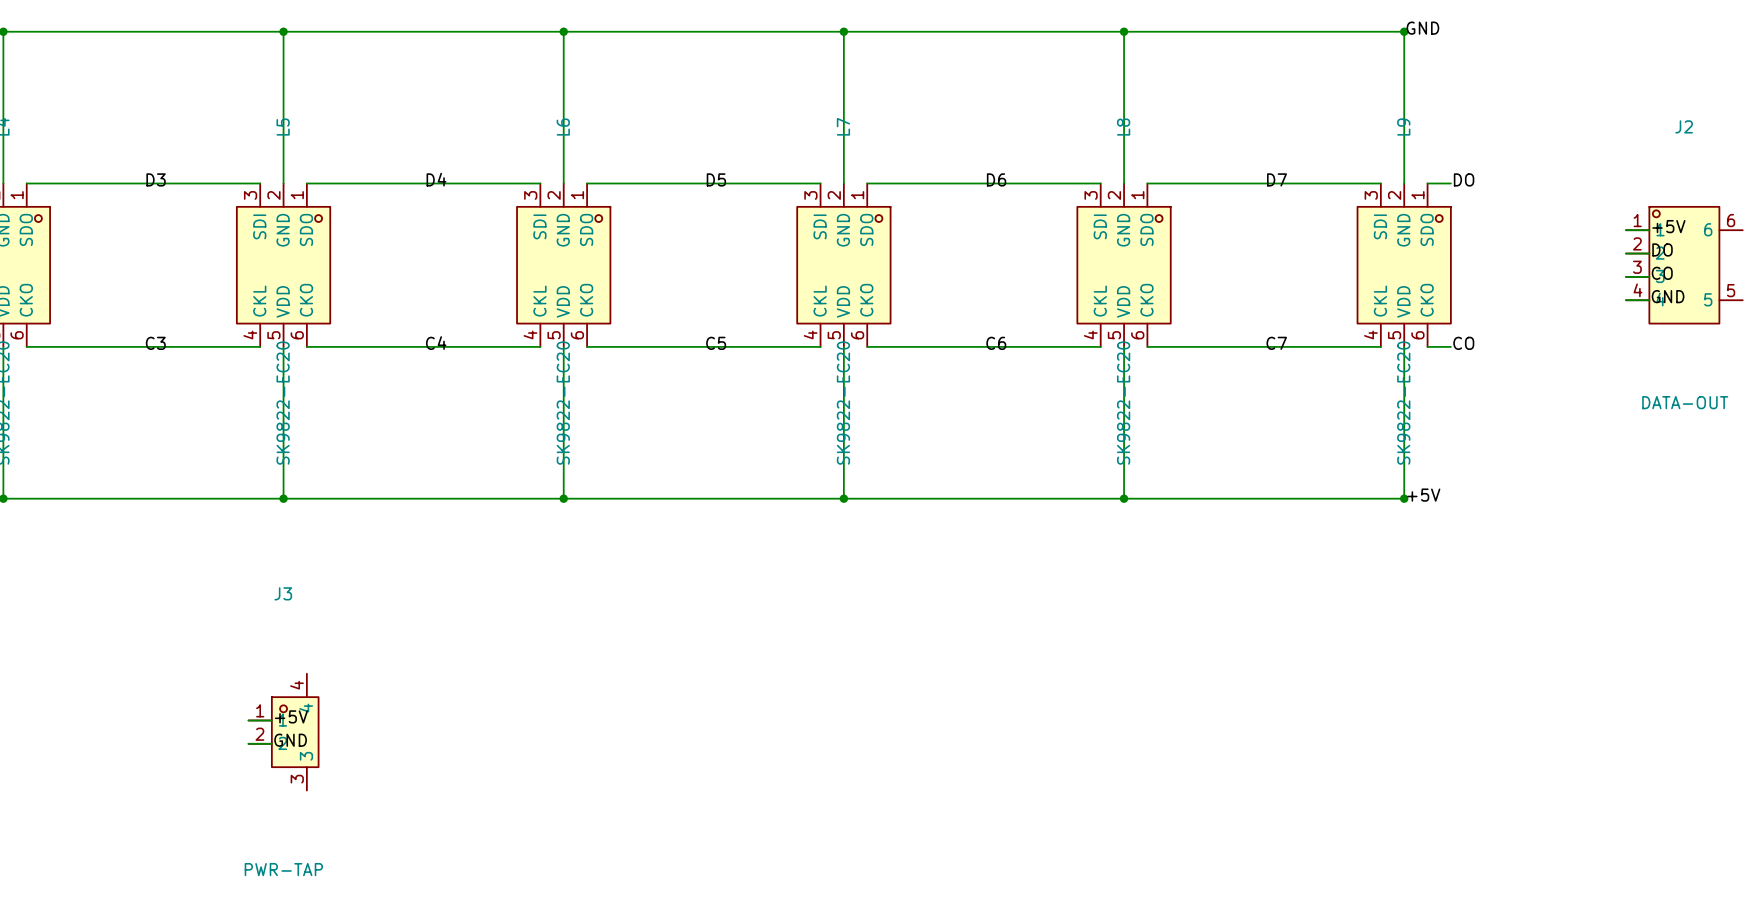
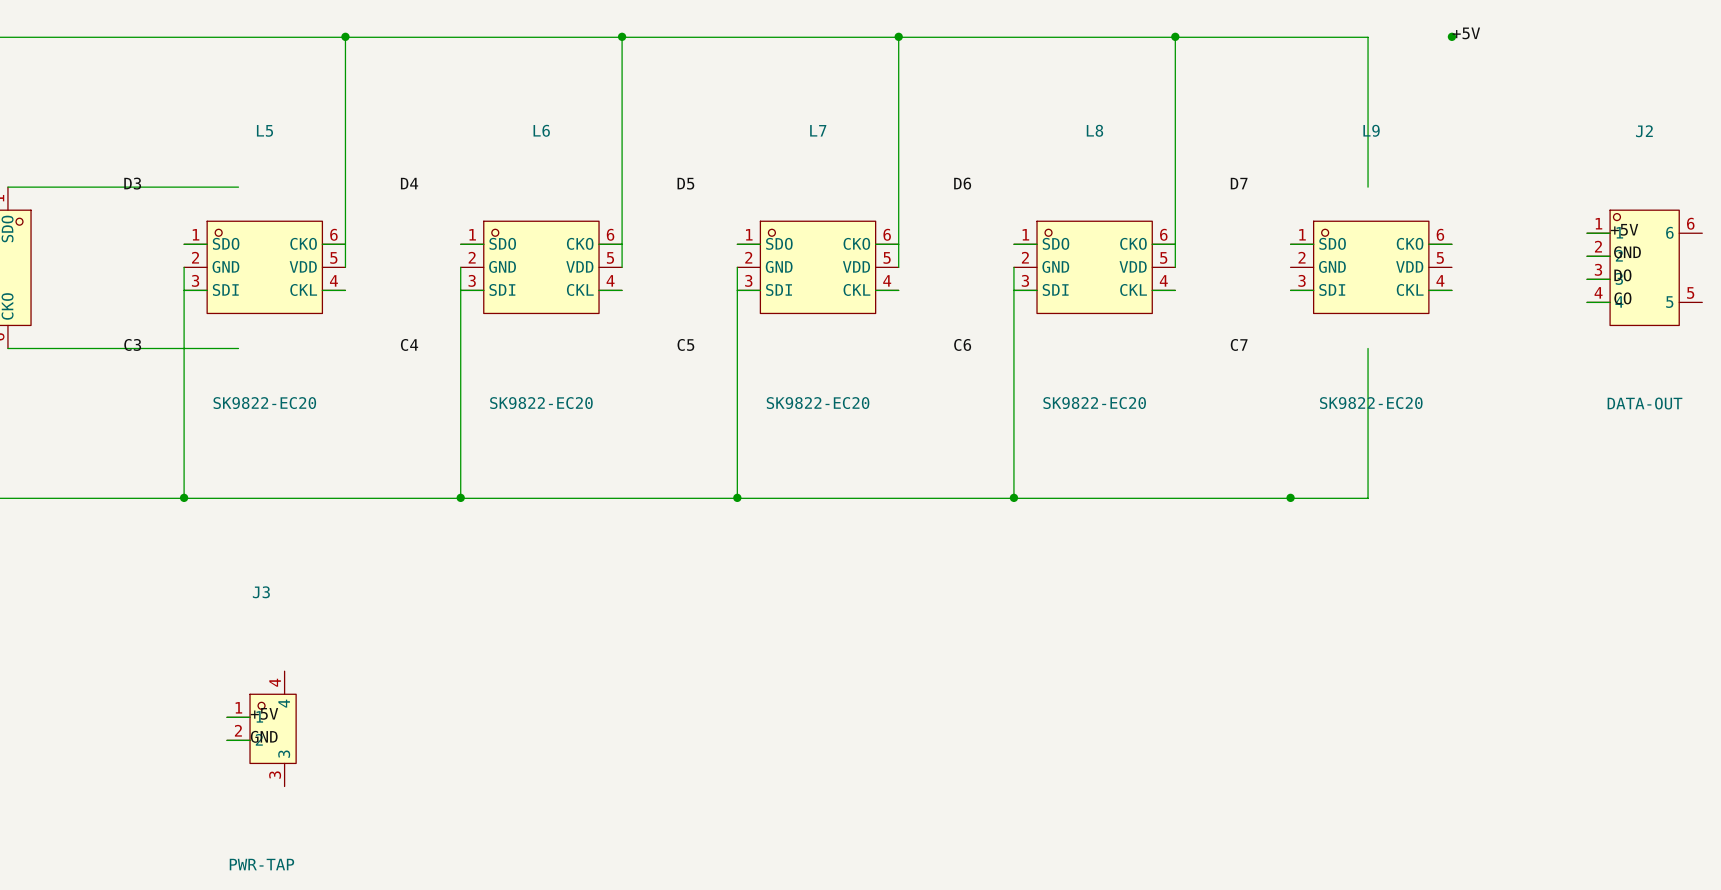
label: none -> +5V (1466, 33)
label: GND (1422, 28) -> none
wire: (283, 31) (283, 183) -> none
junction: (283, 31) -> none
wire: none -> (345, 36) (345, 267)
junction: none -> (345, 36)
wire: (563, 31) (563, 183) -> none
junction: (563, 31) -> none
wire: none -> (622, 36) (622, 267)
junction: none -> (622, 36)
wire: (843, 31) (843, 183) -> none
junction: (843, 31) -> none
wire: none -> (898, 36) (898, 267)
junction: none -> (898, 36)
wire: (1124, 31) (1124, 183) -> none
junction: (1124, 31) -> none
wire: none -> (1175, 36) (1175, 267)
junction: none -> (1175, 36)
junction: (1404, 31) -> none
junction: none -> (1451, 36)
label: DO (1464, 179) -> none
wire: (306, 183) (540, 183) -> none
wire: (587, 183) (820, 183) -> none
wire: (867, 183) (1100, 183) -> none
wire: (1147, 183) (1380, 183) -> none
wire: (1427, 183) (1450, 183) -> (1428, 244) (1451, 244)
wire: none -> (184, 244) (207, 244)
wire: none -> (322, 244) (345, 244)
wire: none -> (460, 244) (483, 244)
wire: none -> (599, 244) (622, 244)
wire: none -> (737, 244) (760, 244)
wire: none -> (875, 244) (898, 244)
wire: none -> (1013, 244) (1037, 244)
wire: none -> (1152, 244) (1175, 244)
wire: none -> (1290, 244) (1313, 244)
label position: DO (1662, 249) -> DO (1622, 275)
wire: none -> (184, 267) (184, 497)
wire: none -> (460, 267) (460, 497)
wire: none -> (737, 267) (737, 497)
wire: none -> (1013, 267) (1013, 497)
L5 rotation: 0° (283, 265) -> 90° counterclockwise (264, 267)
L6 rotation: 0° (563, 265) -> 90° counterclockwise (541, 267)
L7 rotation: 0° (843, 265) -> 90° counterclockwise (818, 267)
L8 rotation: 0° (1124, 265) -> 90° counterclockwise (1094, 267)
L9 rotation: 0° (1404, 265) -> 90° counterclockwise (1371, 267)
label position: CO (1662, 273) -> CO (1622, 298)
wire: none -> (184, 290) (207, 290)
wire: none -> (322, 290) (345, 290)
wire: none -> (460, 290) (483, 290)
wire: none -> (599, 290) (622, 290)
wire: none -> (737, 290) (760, 290)
wire: none -> (875, 290) (898, 290)
wire: none -> (1013, 290) (1037, 290)
wire: none -> (1152, 290) (1175, 290)
wire: none -> (1290, 290) (1313, 290)
label position: GND (1668, 296) -> GND (1627, 252)
label: CO (1463, 343) -> none
wire: (283, 346) (283, 498) -> none
wire: (306, 346) (540, 346) -> none
wire: (563, 346) (563, 498) -> none
wire: (587, 346) (820, 346) -> none
wire: (843, 346) (843, 498) -> none
wire: (867, 346) (1100, 346) -> none
wire: (1124, 346) (1124, 498) -> none
wire: (1147, 346) (1380, 346) -> none
wire: (1427, 346) (1450, 346) -> (1428, 290) (1451, 290)
label: +5V (1423, 495) -> none
junction: none -> (184, 497)
junction: (283, 498) -> none
junction: none -> (460, 497)
junction: (563, 498) -> none
junction: none -> (737, 497)
junction: (843, 498) -> none
junction: none -> (1013, 497)
junction: (1124, 498) -> none
junction: none -> (1290, 497)
junction: (1404, 498) -> none

